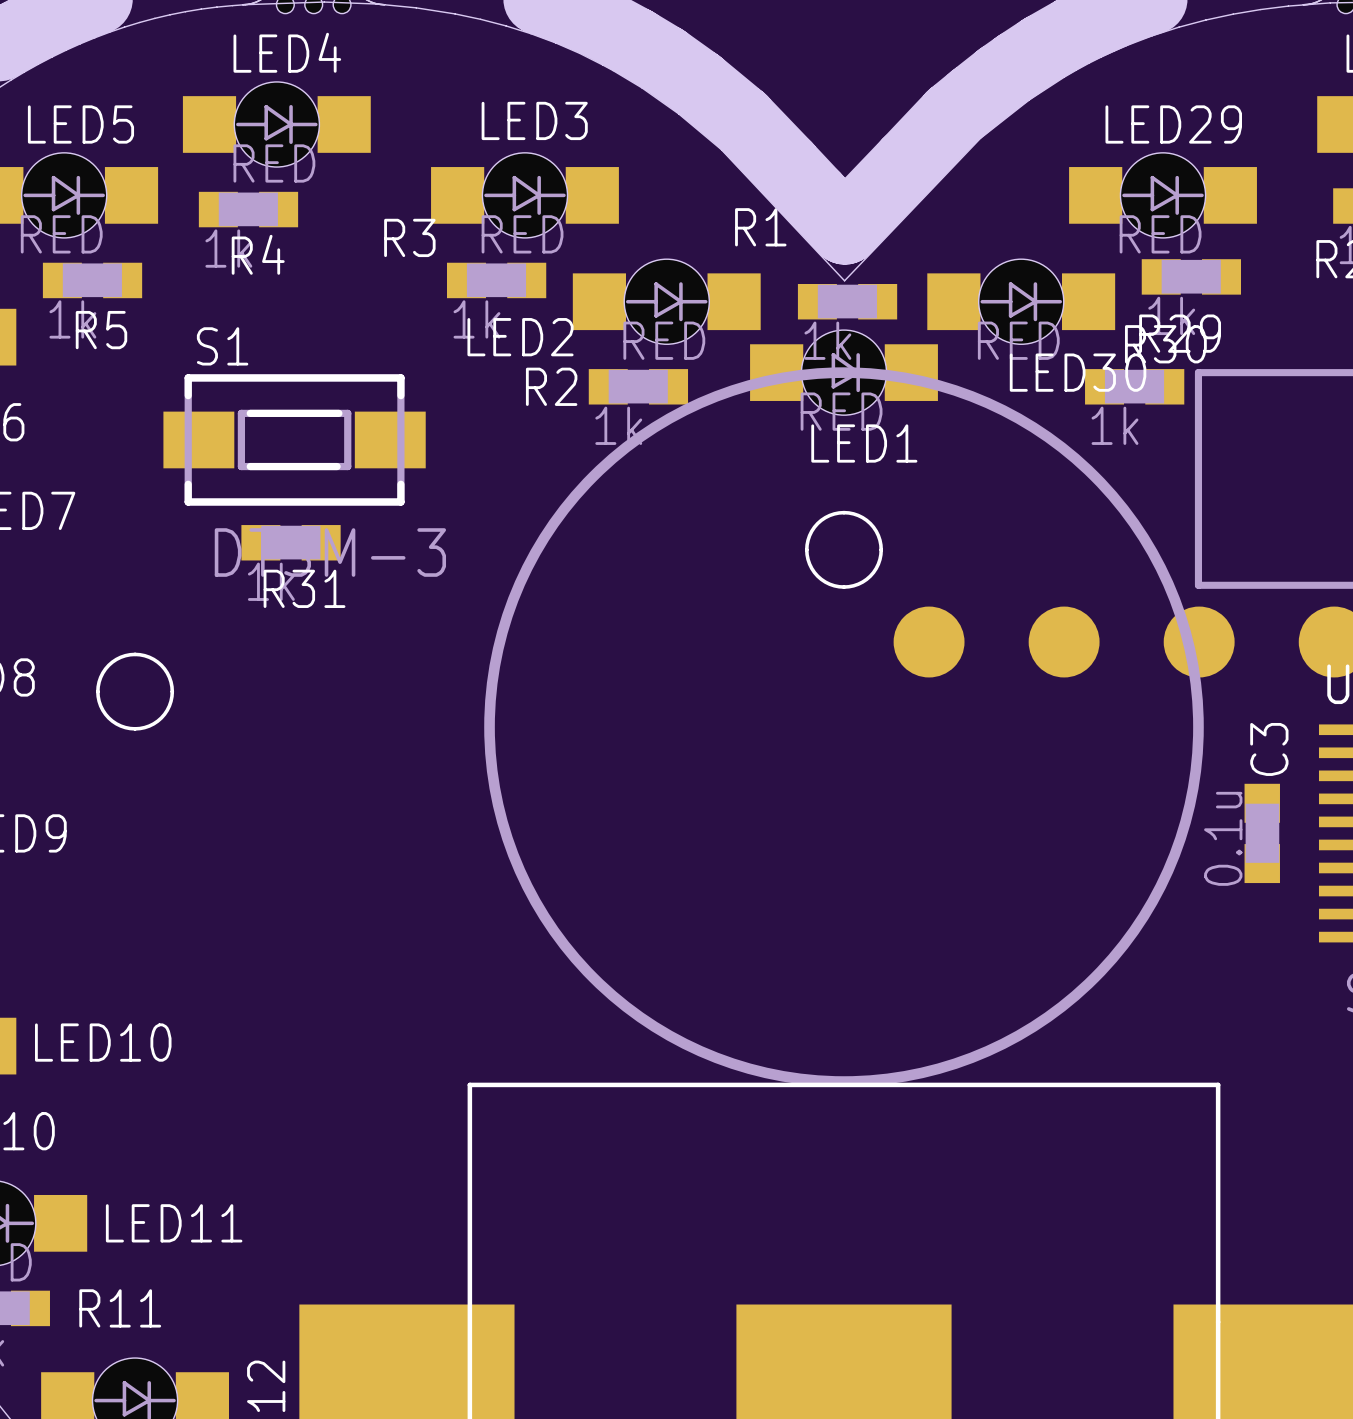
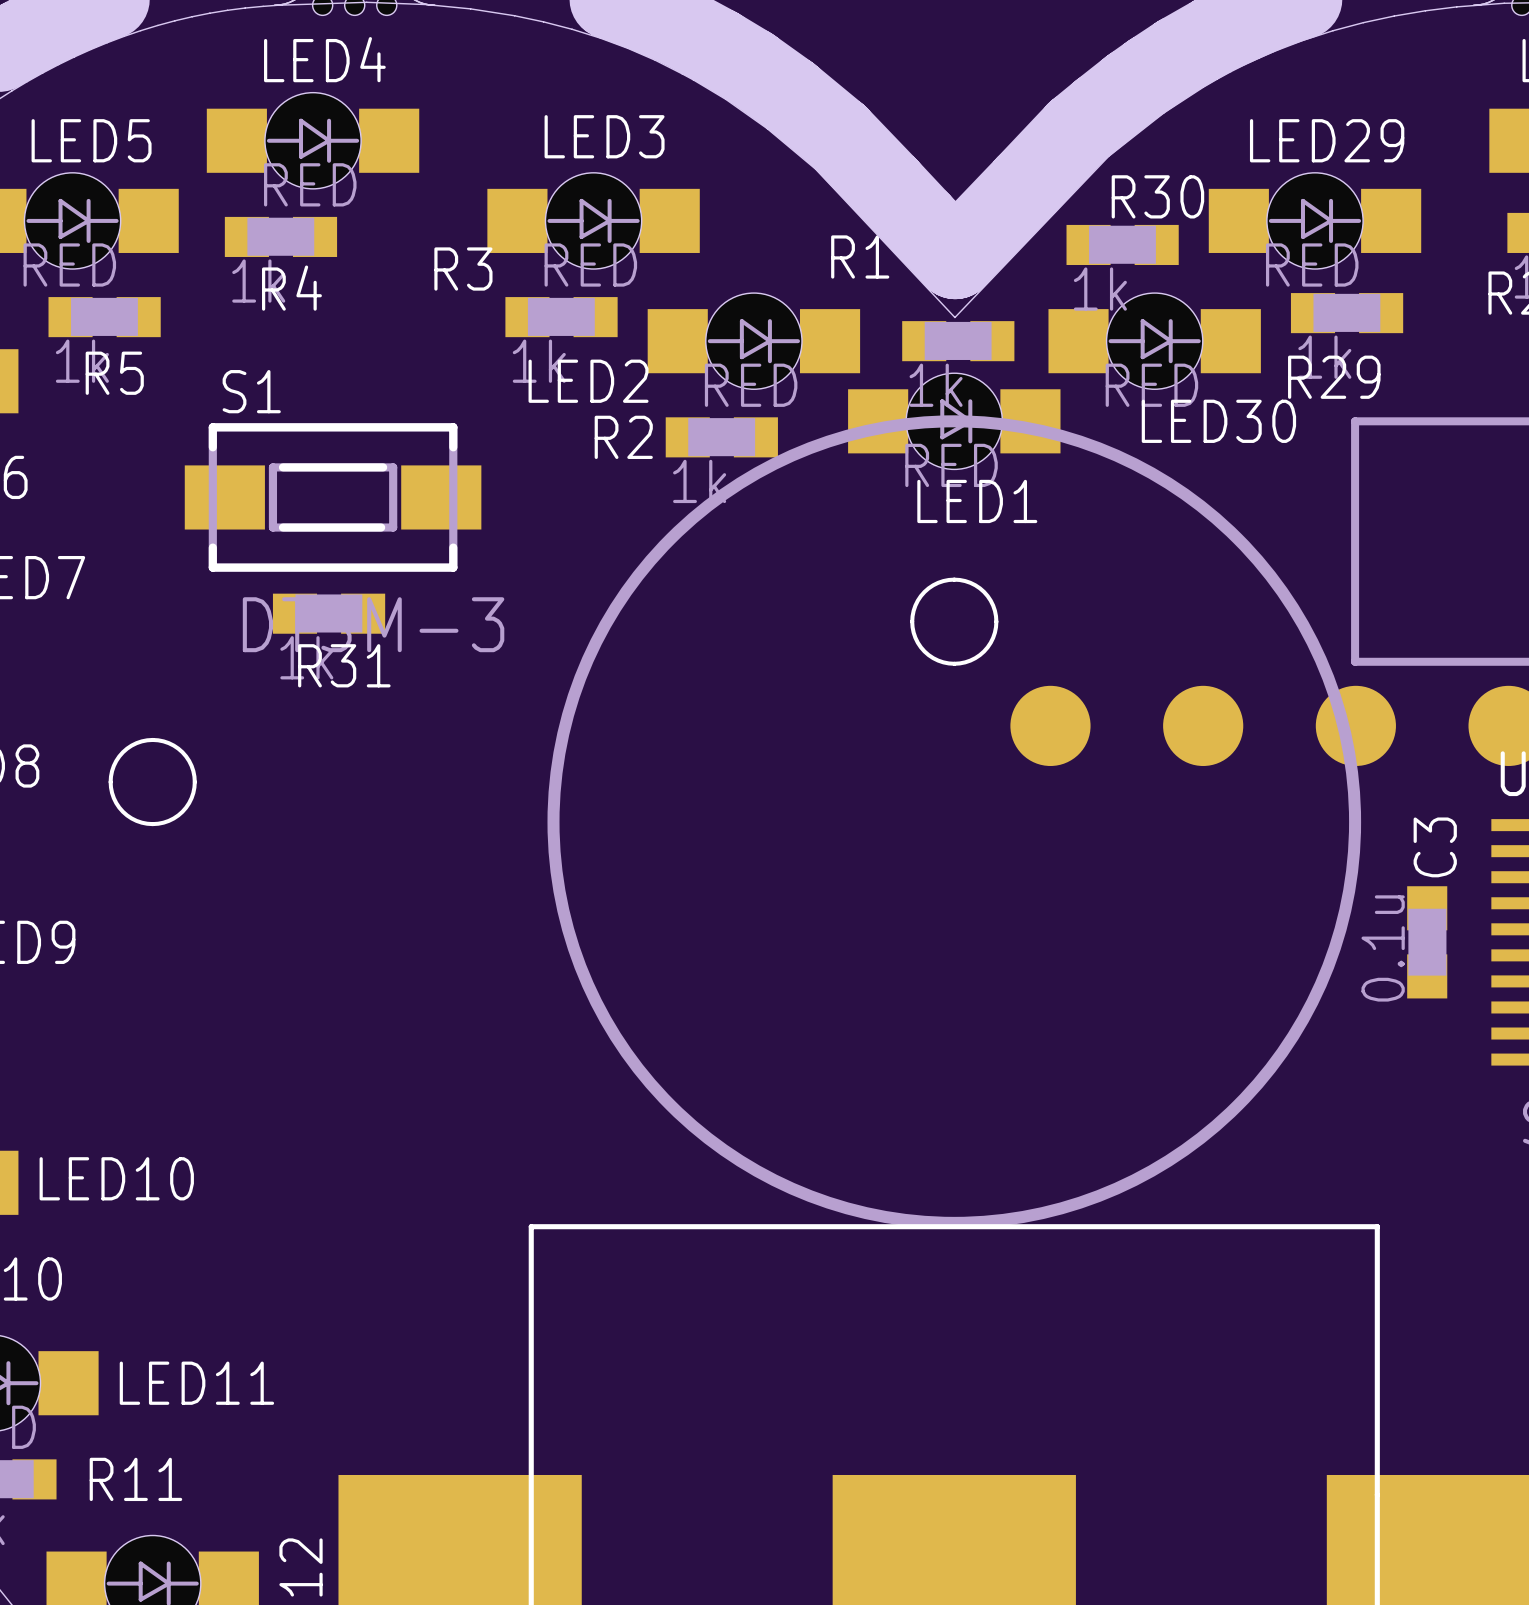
R30 position: (1134, 386) -> (1122, 244)

